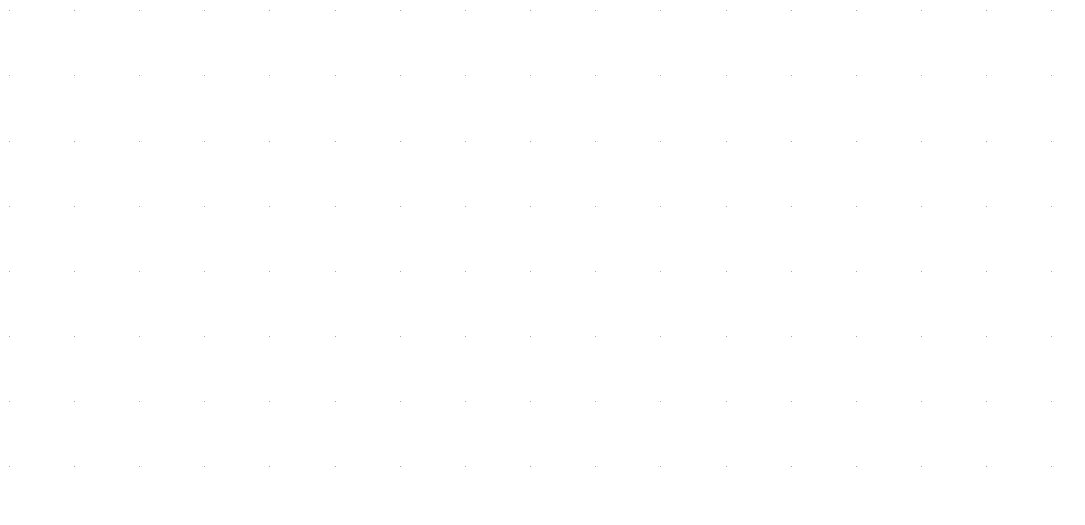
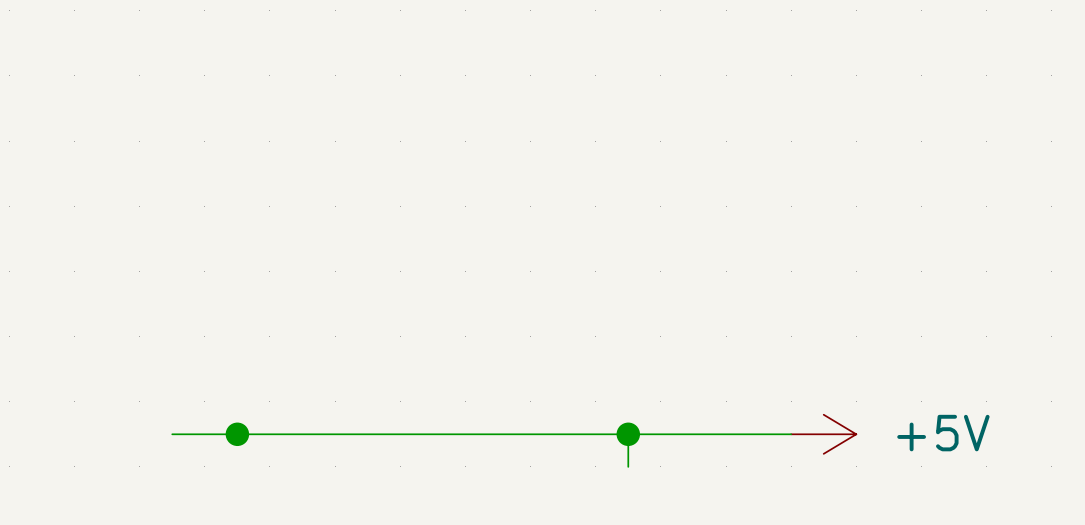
wire: none -> (172, 434) (791, 434)
junction: none -> (237, 434)
wire: none -> (628, 434) (628, 466)
junction: none -> (628, 434)
power symbol: none -> +5V (823, 434)

